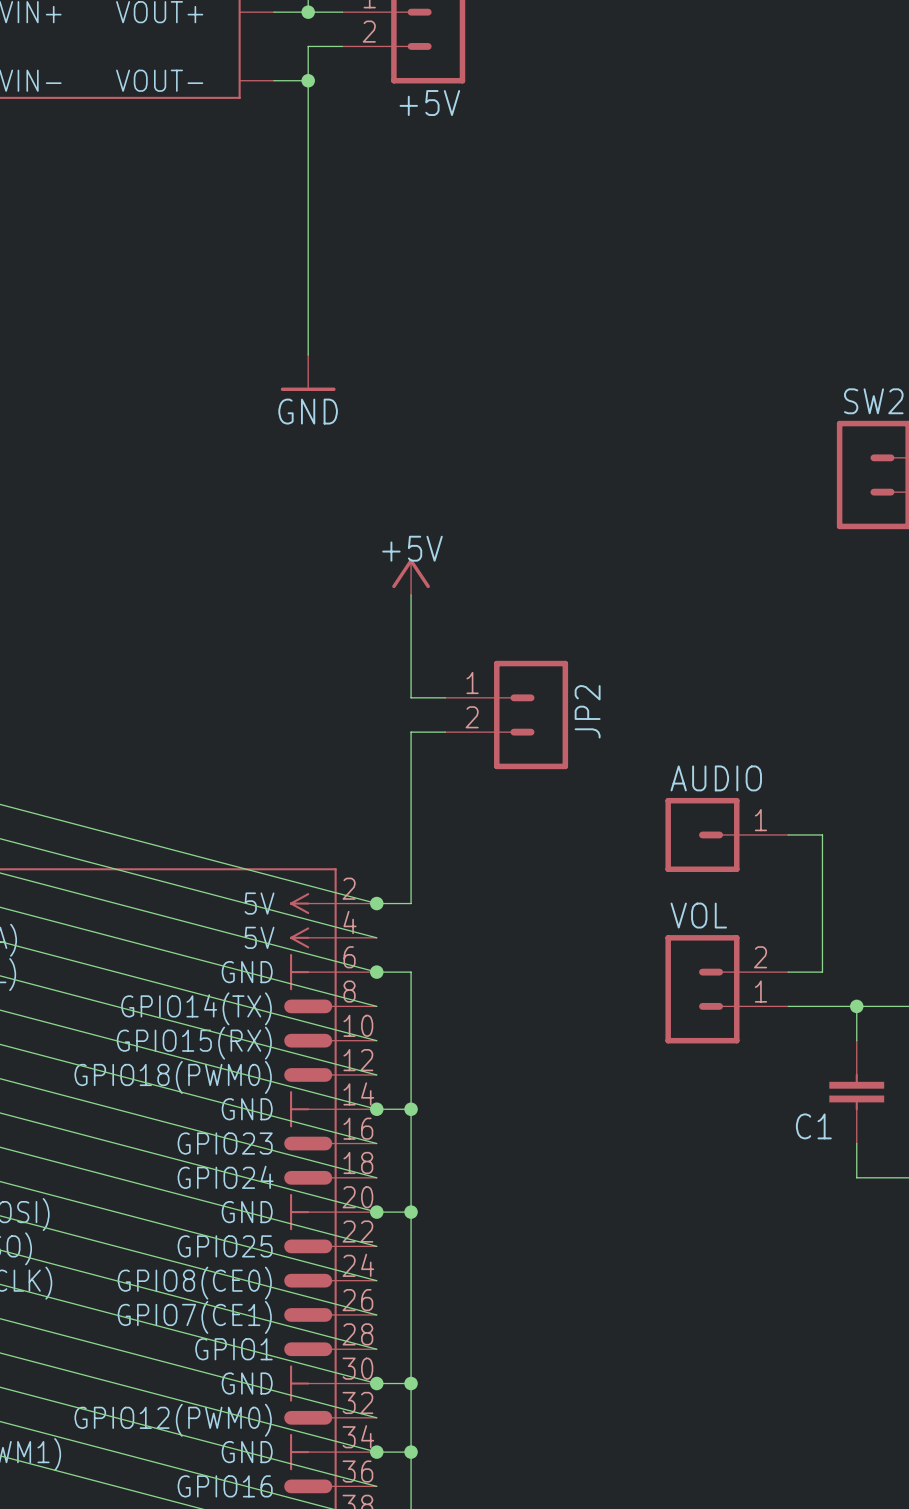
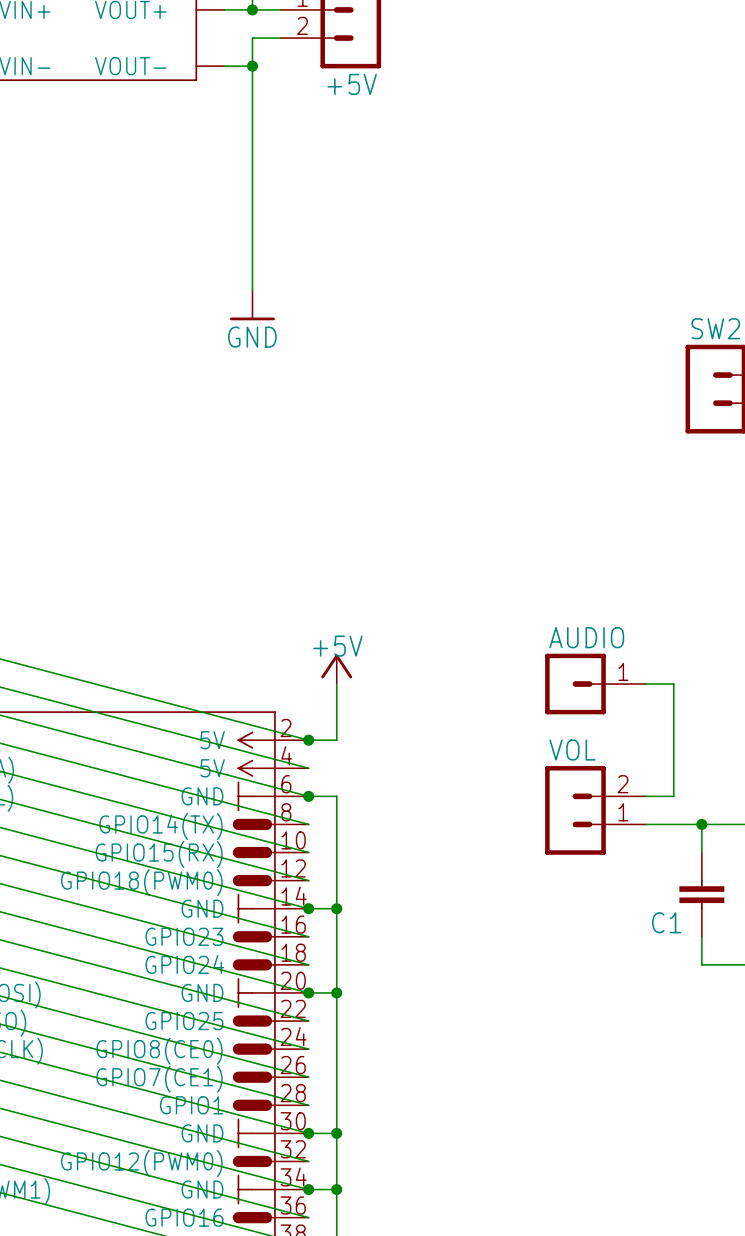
power symbol position: +5V (411, 576) -> +5V (336, 669)
wire: (411, 594) (411, 697) (445, 697) -> none
JP2: (506, 714) -> none
wire: (445, 732) (411, 732) (411, 834) -> none

